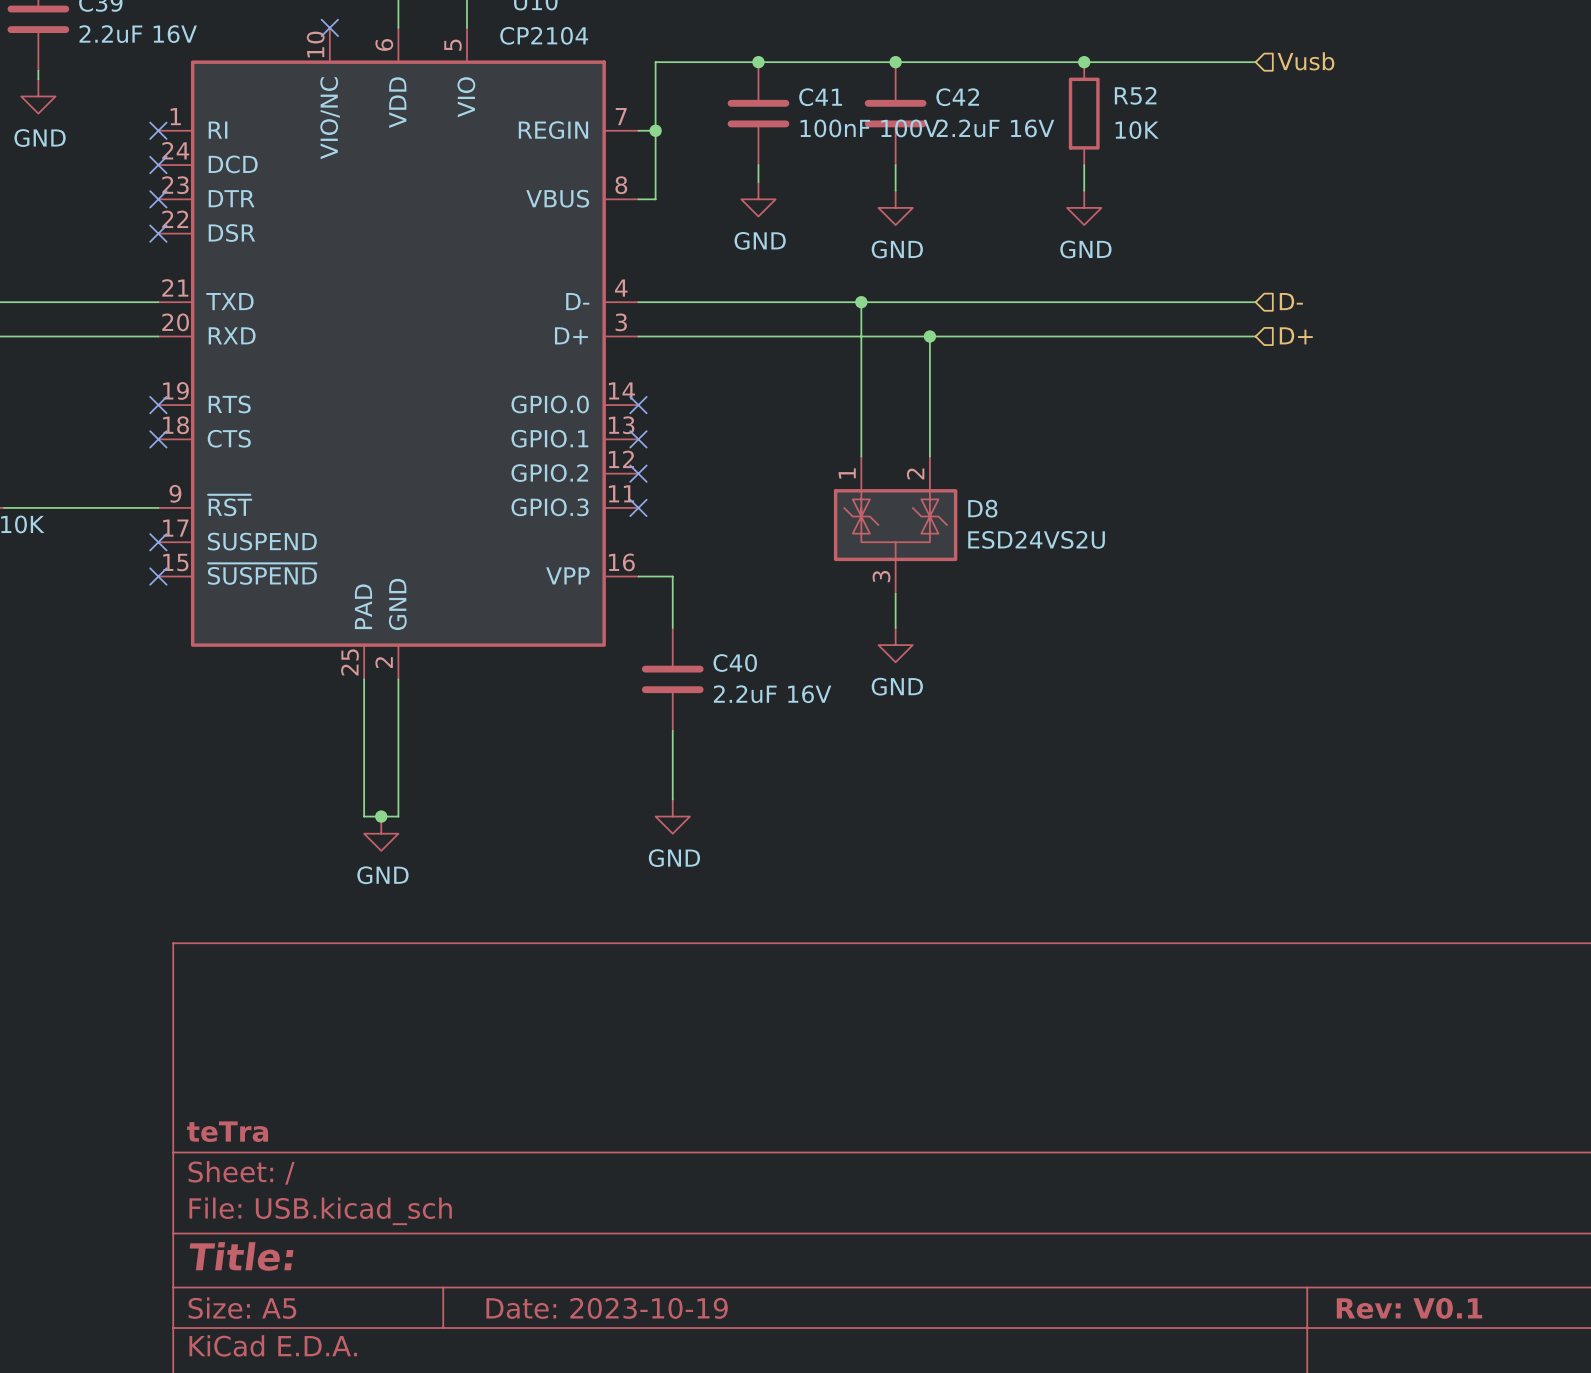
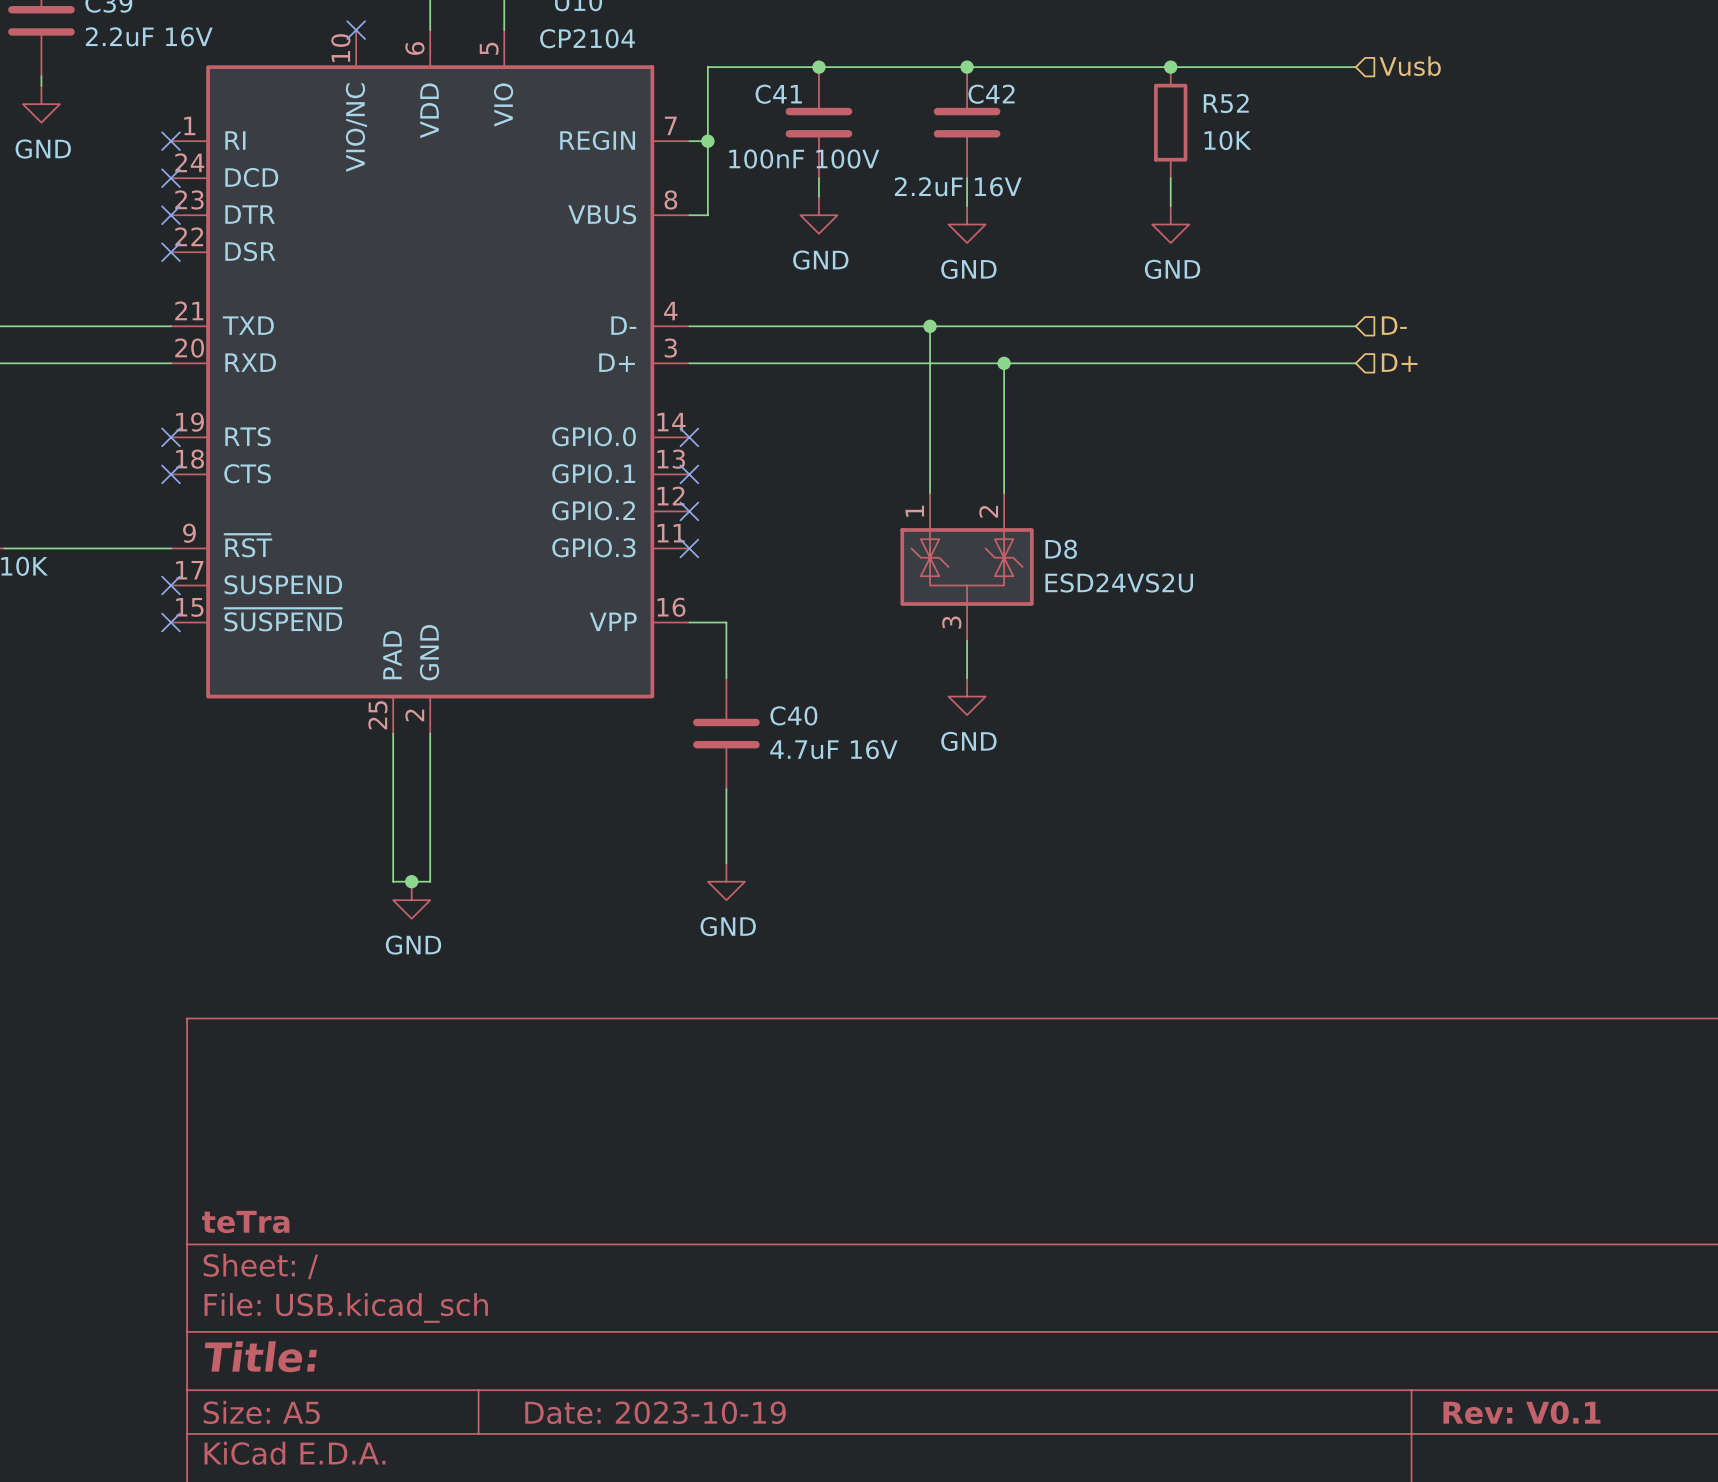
C41 name position: C41 (820, 97) -> C41 (778, 94)
C42 name position: C42 (957, 97) -> C42 (991, 94)
C41 value position: 100nF 100V (869, 128) -> 100nF 100V (804, 159)
C42 value position: 2.2uF 16V (995, 128) -> 2.2uF 16V (958, 186)
C40 value: 2.2uF 16V (772, 694) -> 4.7uF 16V (833, 749)

